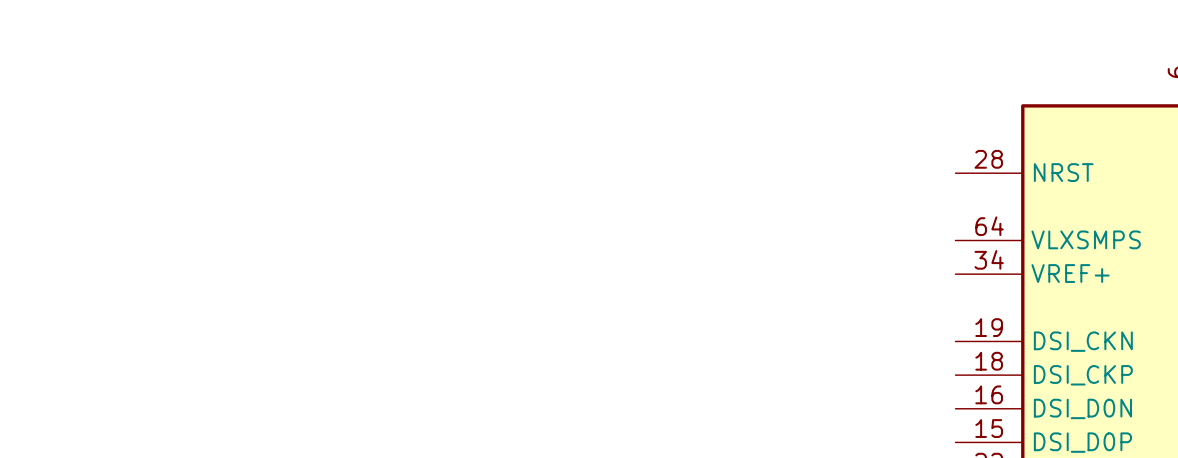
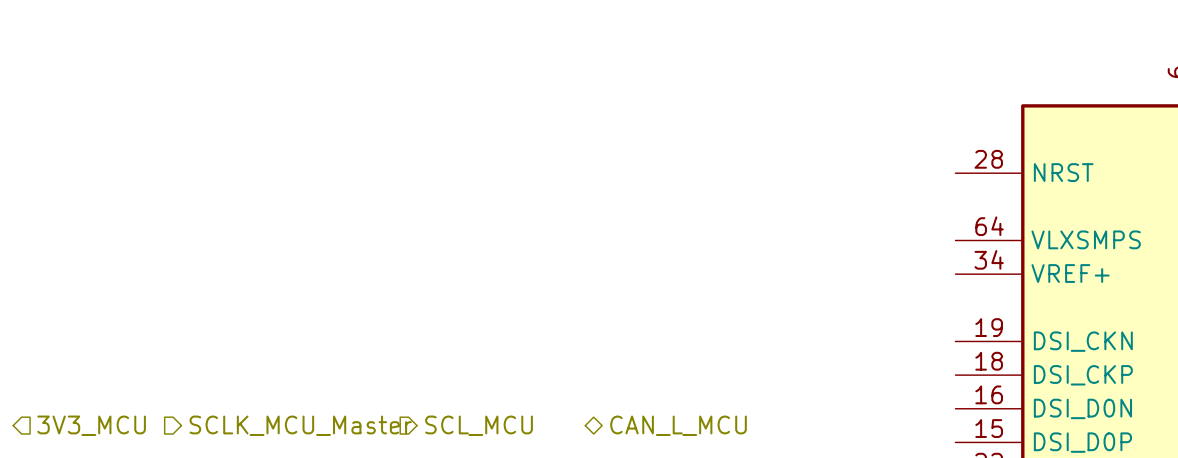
hierarchical label: none -> 3V3_MCU (91, 425)
hierarchical label: none -> SCLK_MCU_Master (300, 425)
hierarchical label: none -> SCL_MCU (479, 425)
hierarchical label: none -> CAN_L_MCU (678, 425)

